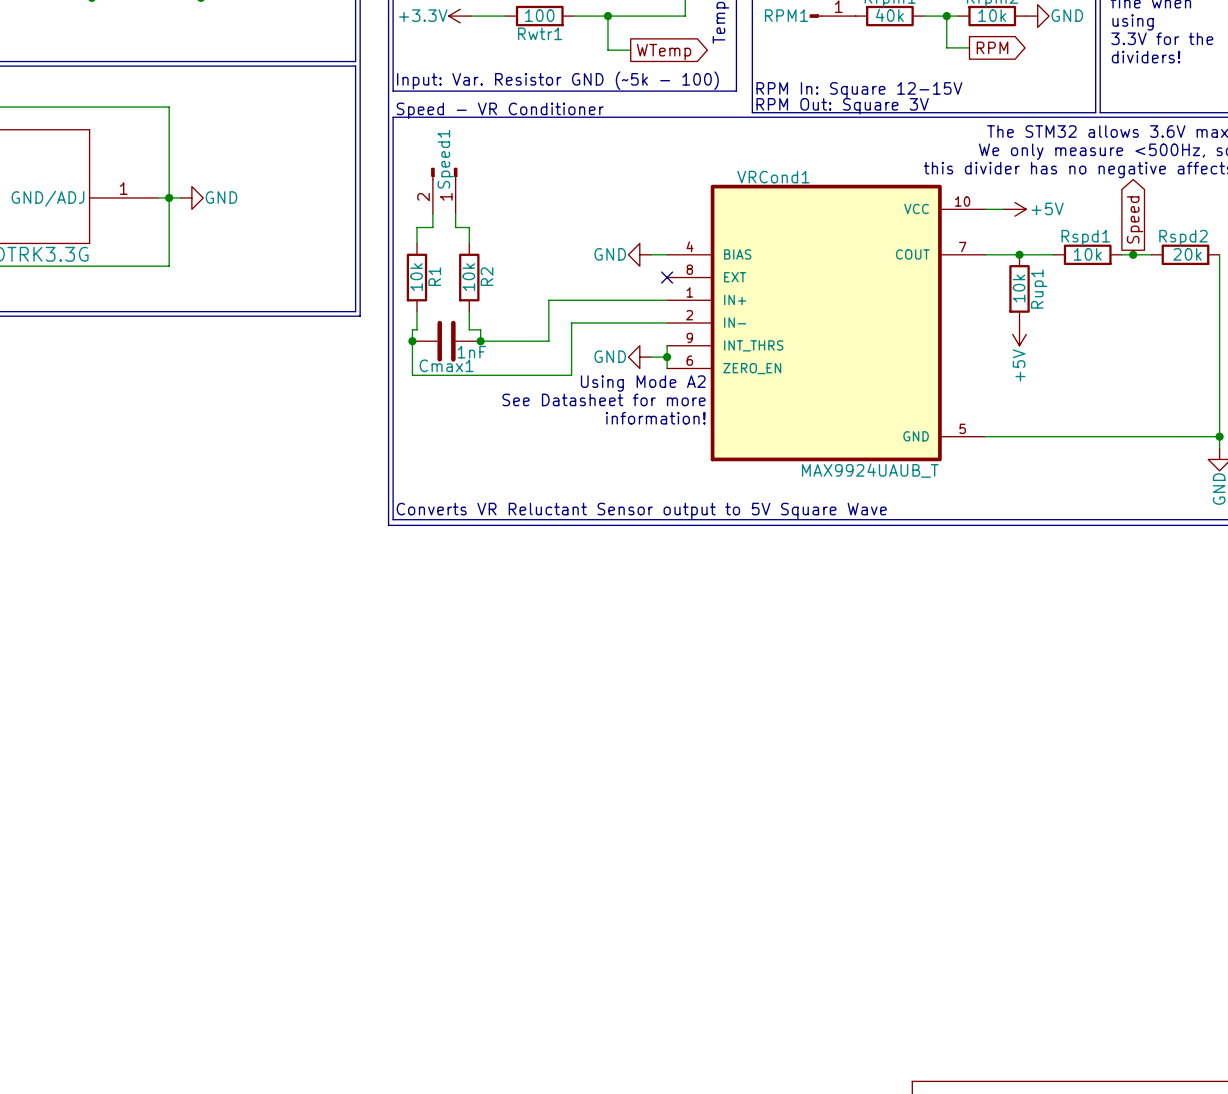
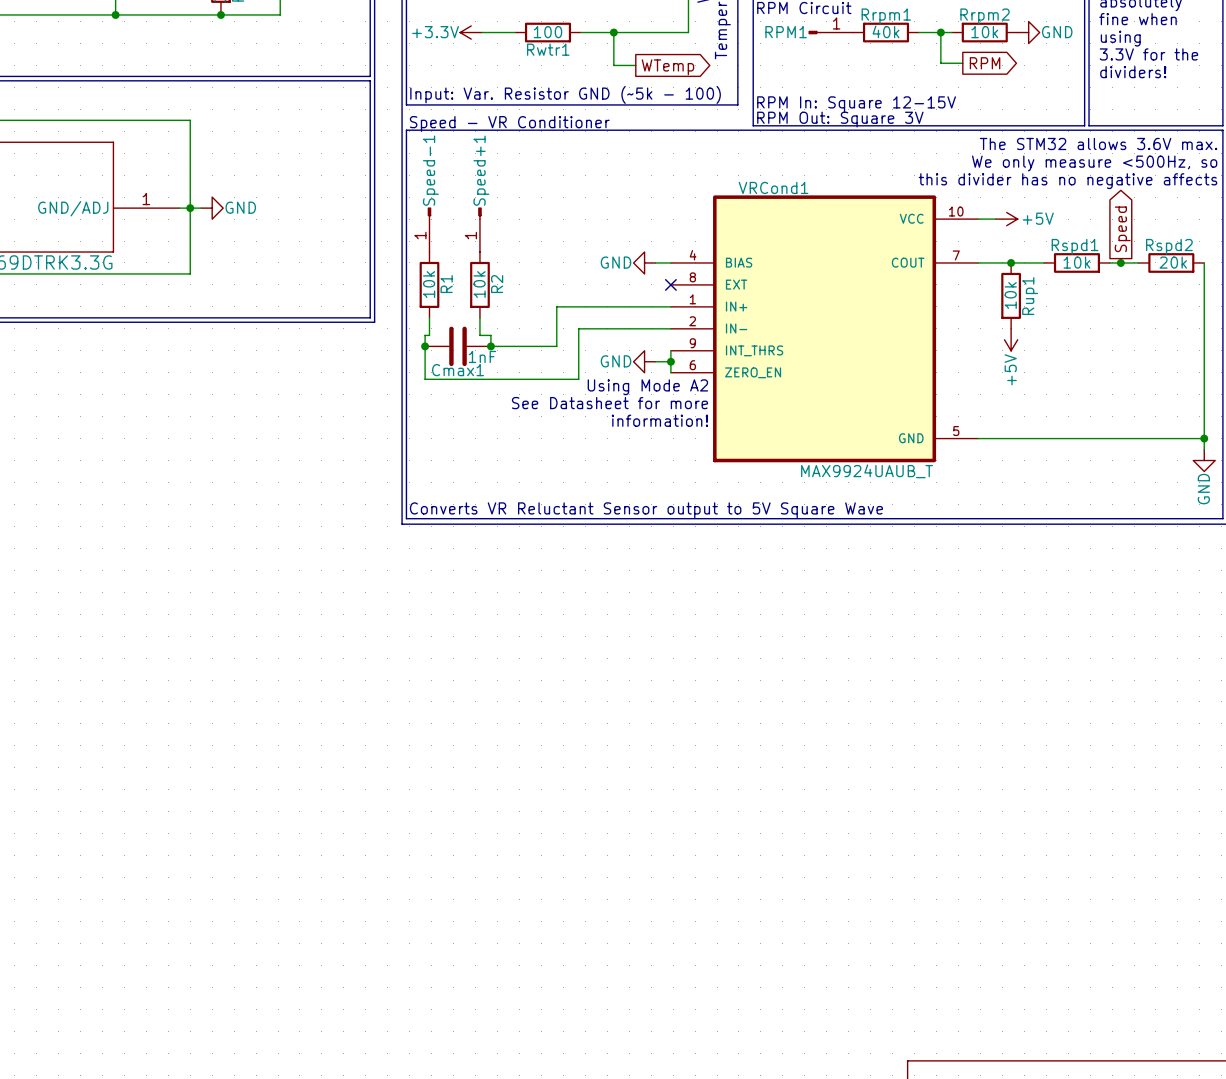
Speed1: (444, 190) -> none
wire: (432, 213) (432, 227) (416, 227) (416, 243) -> none
wire: (455, 213) (455, 227) (469, 227) (469, 243) -> none
Speed-1: none -> (429, 229)
Speed+1: none -> (479, 229)

